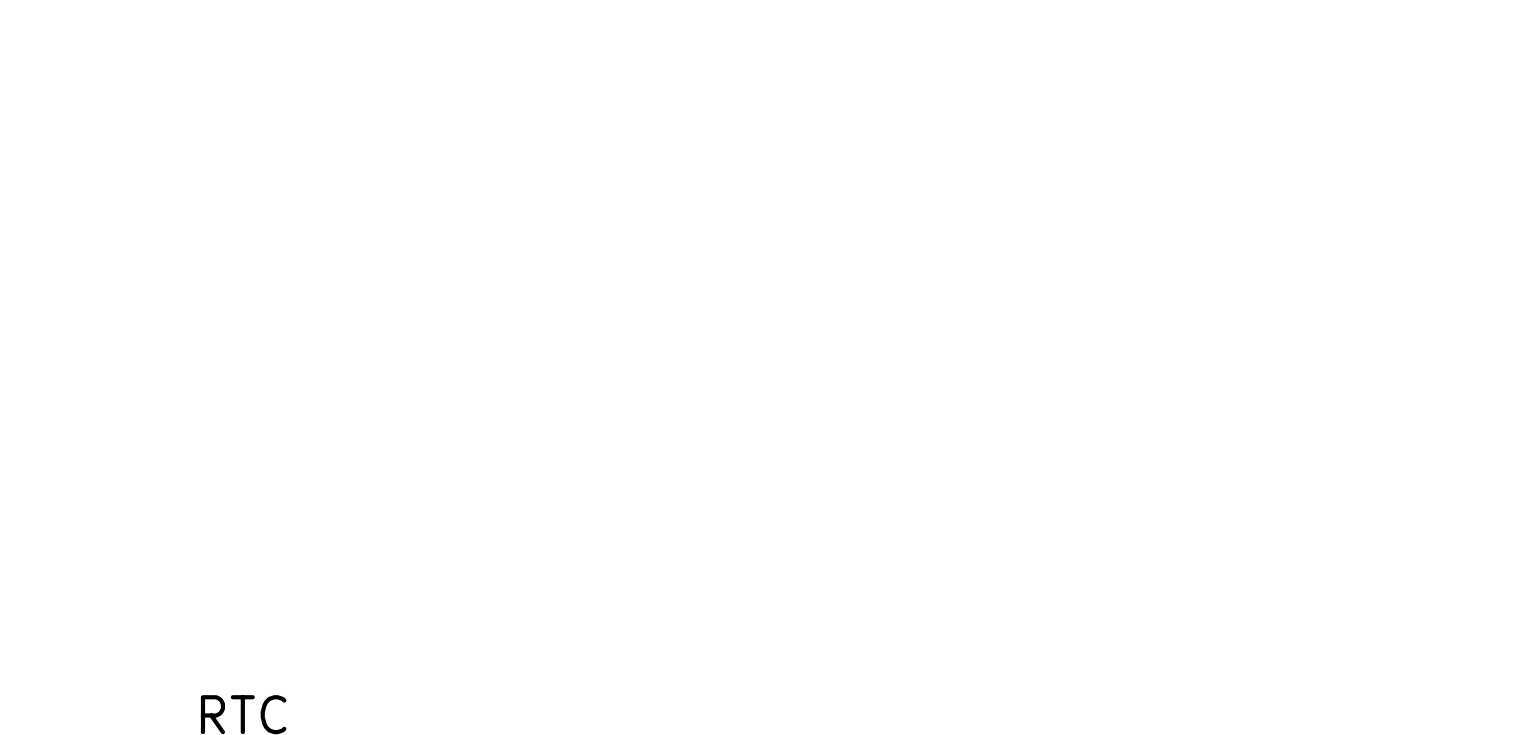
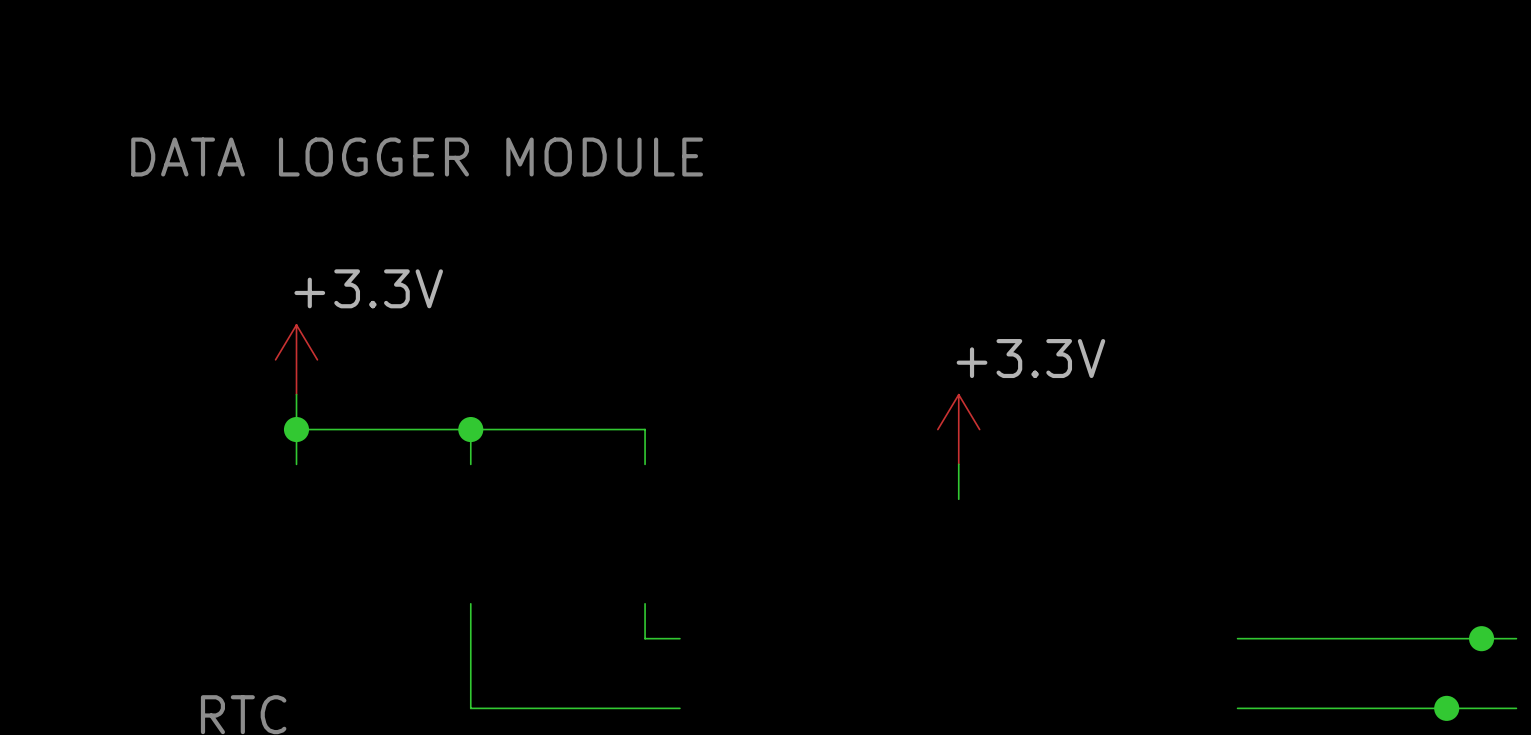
text: none -> DATA LOGGER MODULE (417, 157)
power symbol: none -> +3.3V (296, 359)
wire: none -> (296, 394) (296, 464)
wire: none -> (296, 429) (645, 429) (645, 464)
junction: none -> (296, 429)
wire: none -> (470, 429) (470, 464)
junction: none -> (470, 429)
power symbol: none -> +3.3V (958, 429)
wire: none -> (958, 464) (958, 499)
wire: none -> (470, 603) (470, 708) (679, 708)
wire: none -> (645, 603) (645, 638) (679, 638)
wire: none -> (1237, 638) (1516, 638)
junction: none -> (1481, 638)
wire: none -> (1237, 708) (1516, 708)
junction: none -> (1446, 708)

